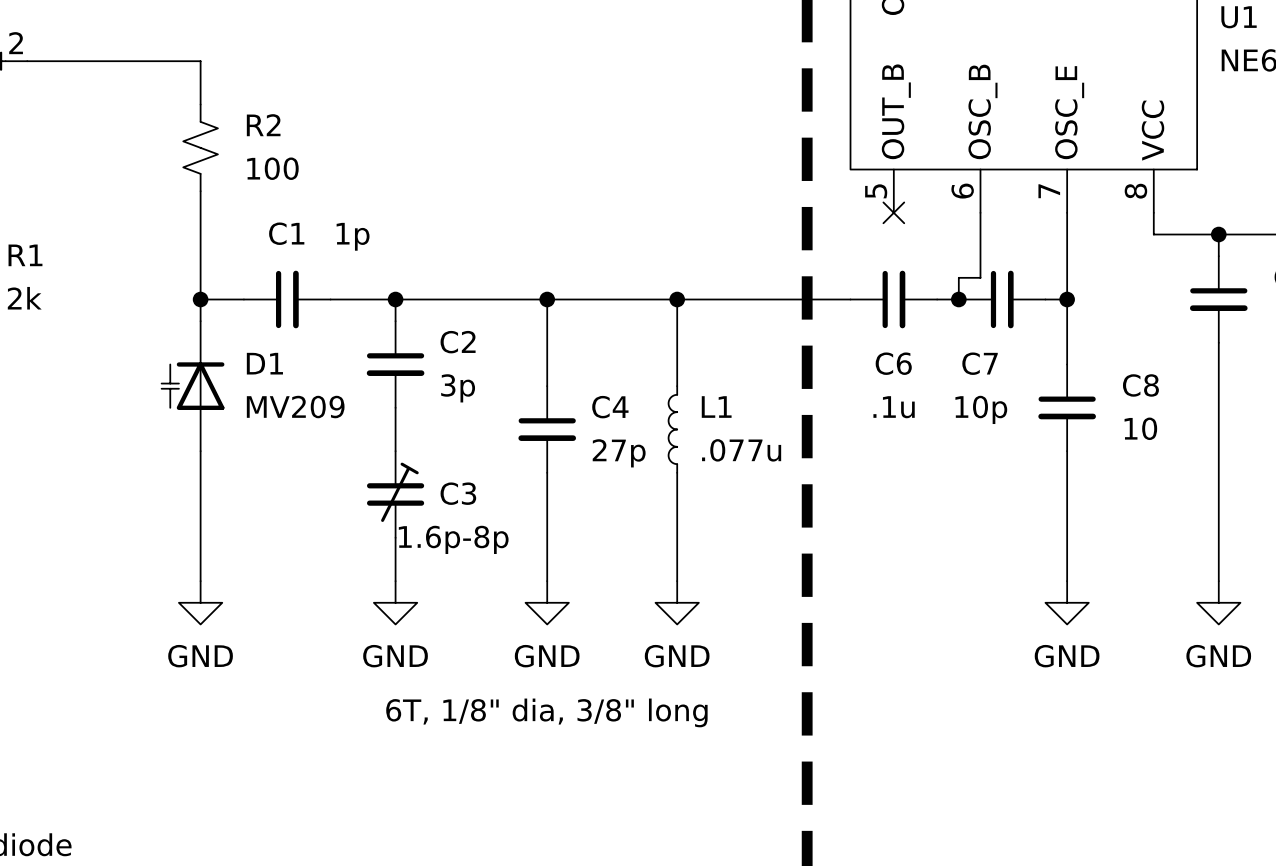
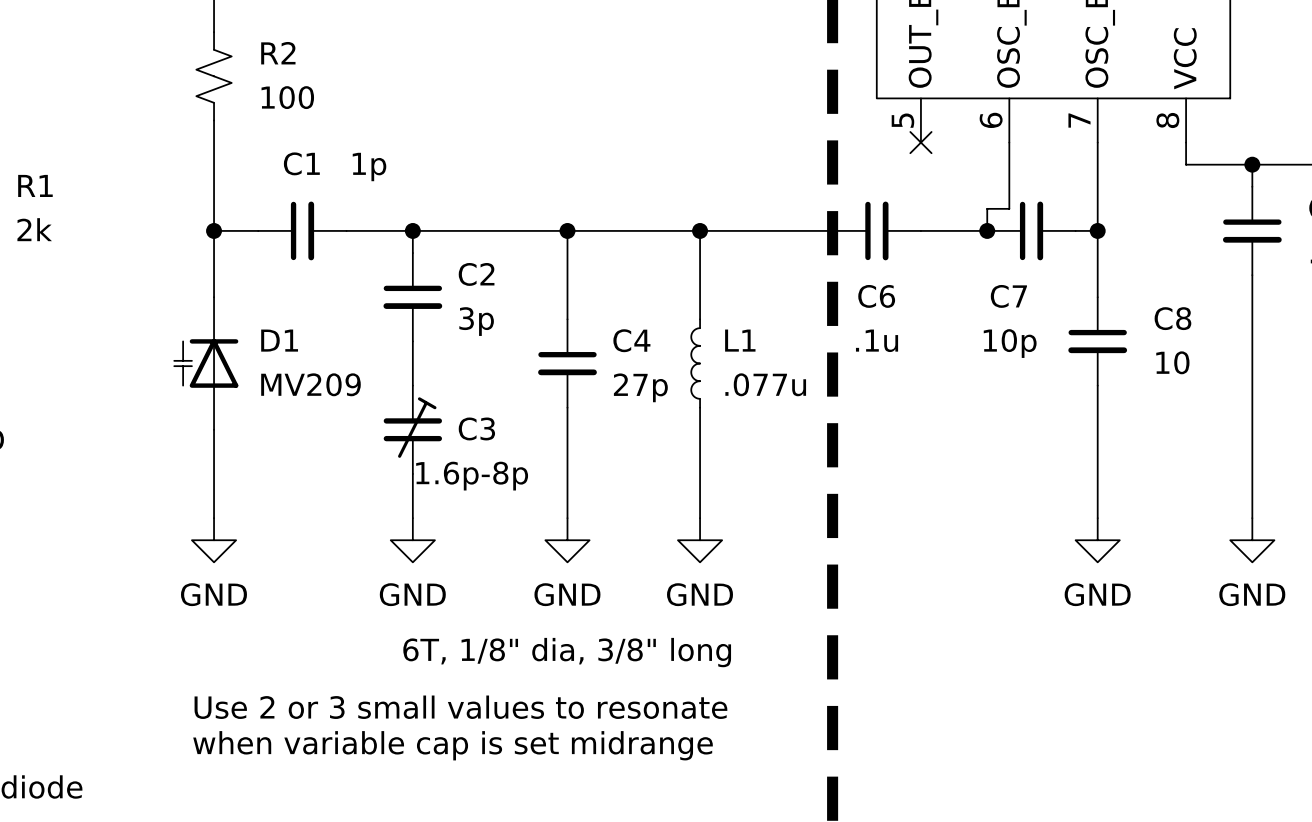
C6 position: (893, 299) -> (876, 230)
D1 position: (193, 386) -> (206, 363)
text: none -> Use 2 or 3 small values to resonate (460, 707)
text: none -> when variable cap is set midrange (453, 745)

